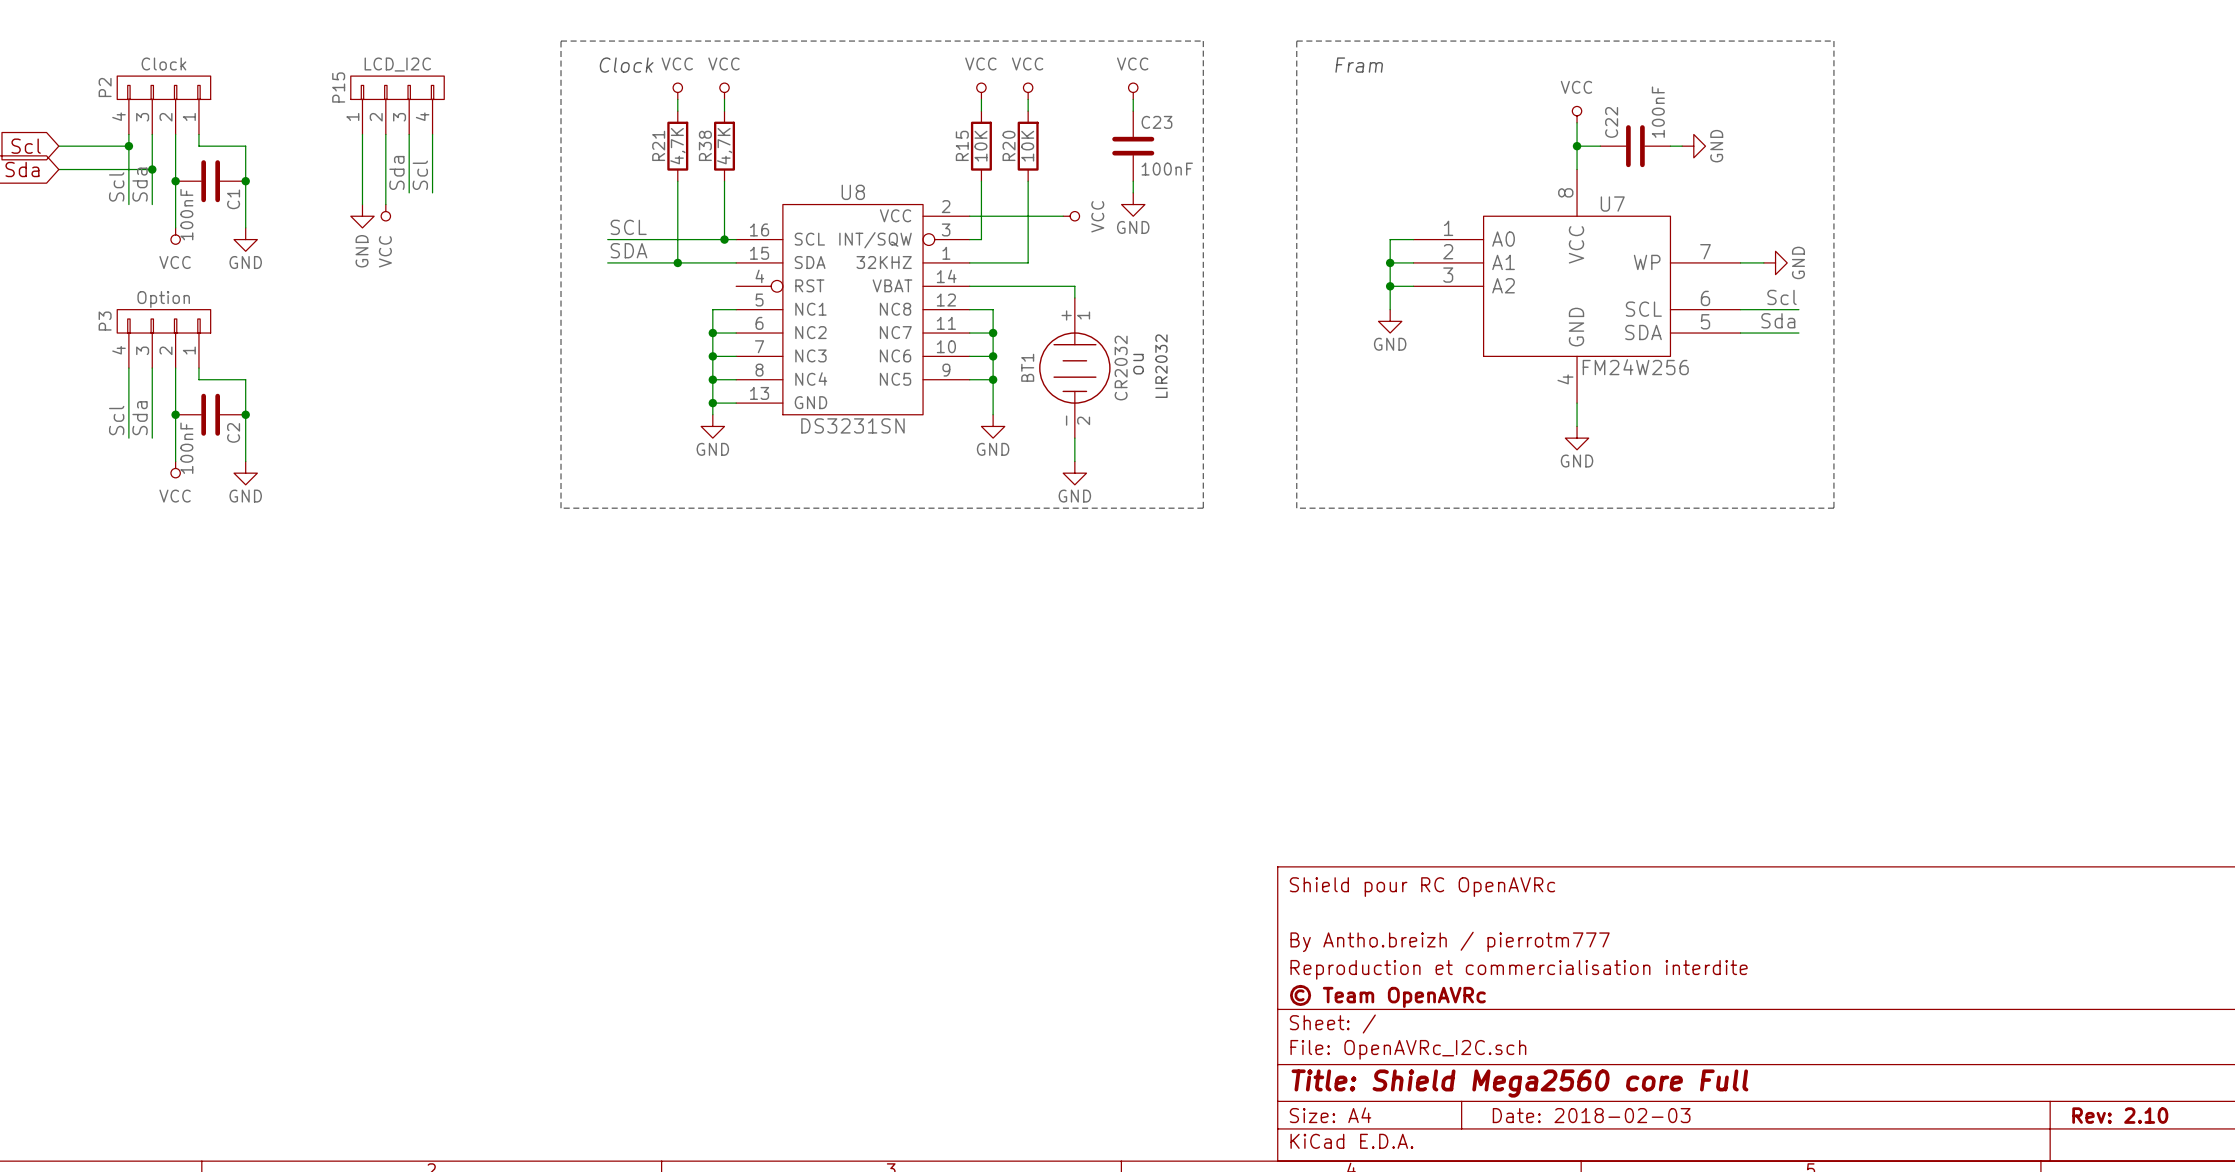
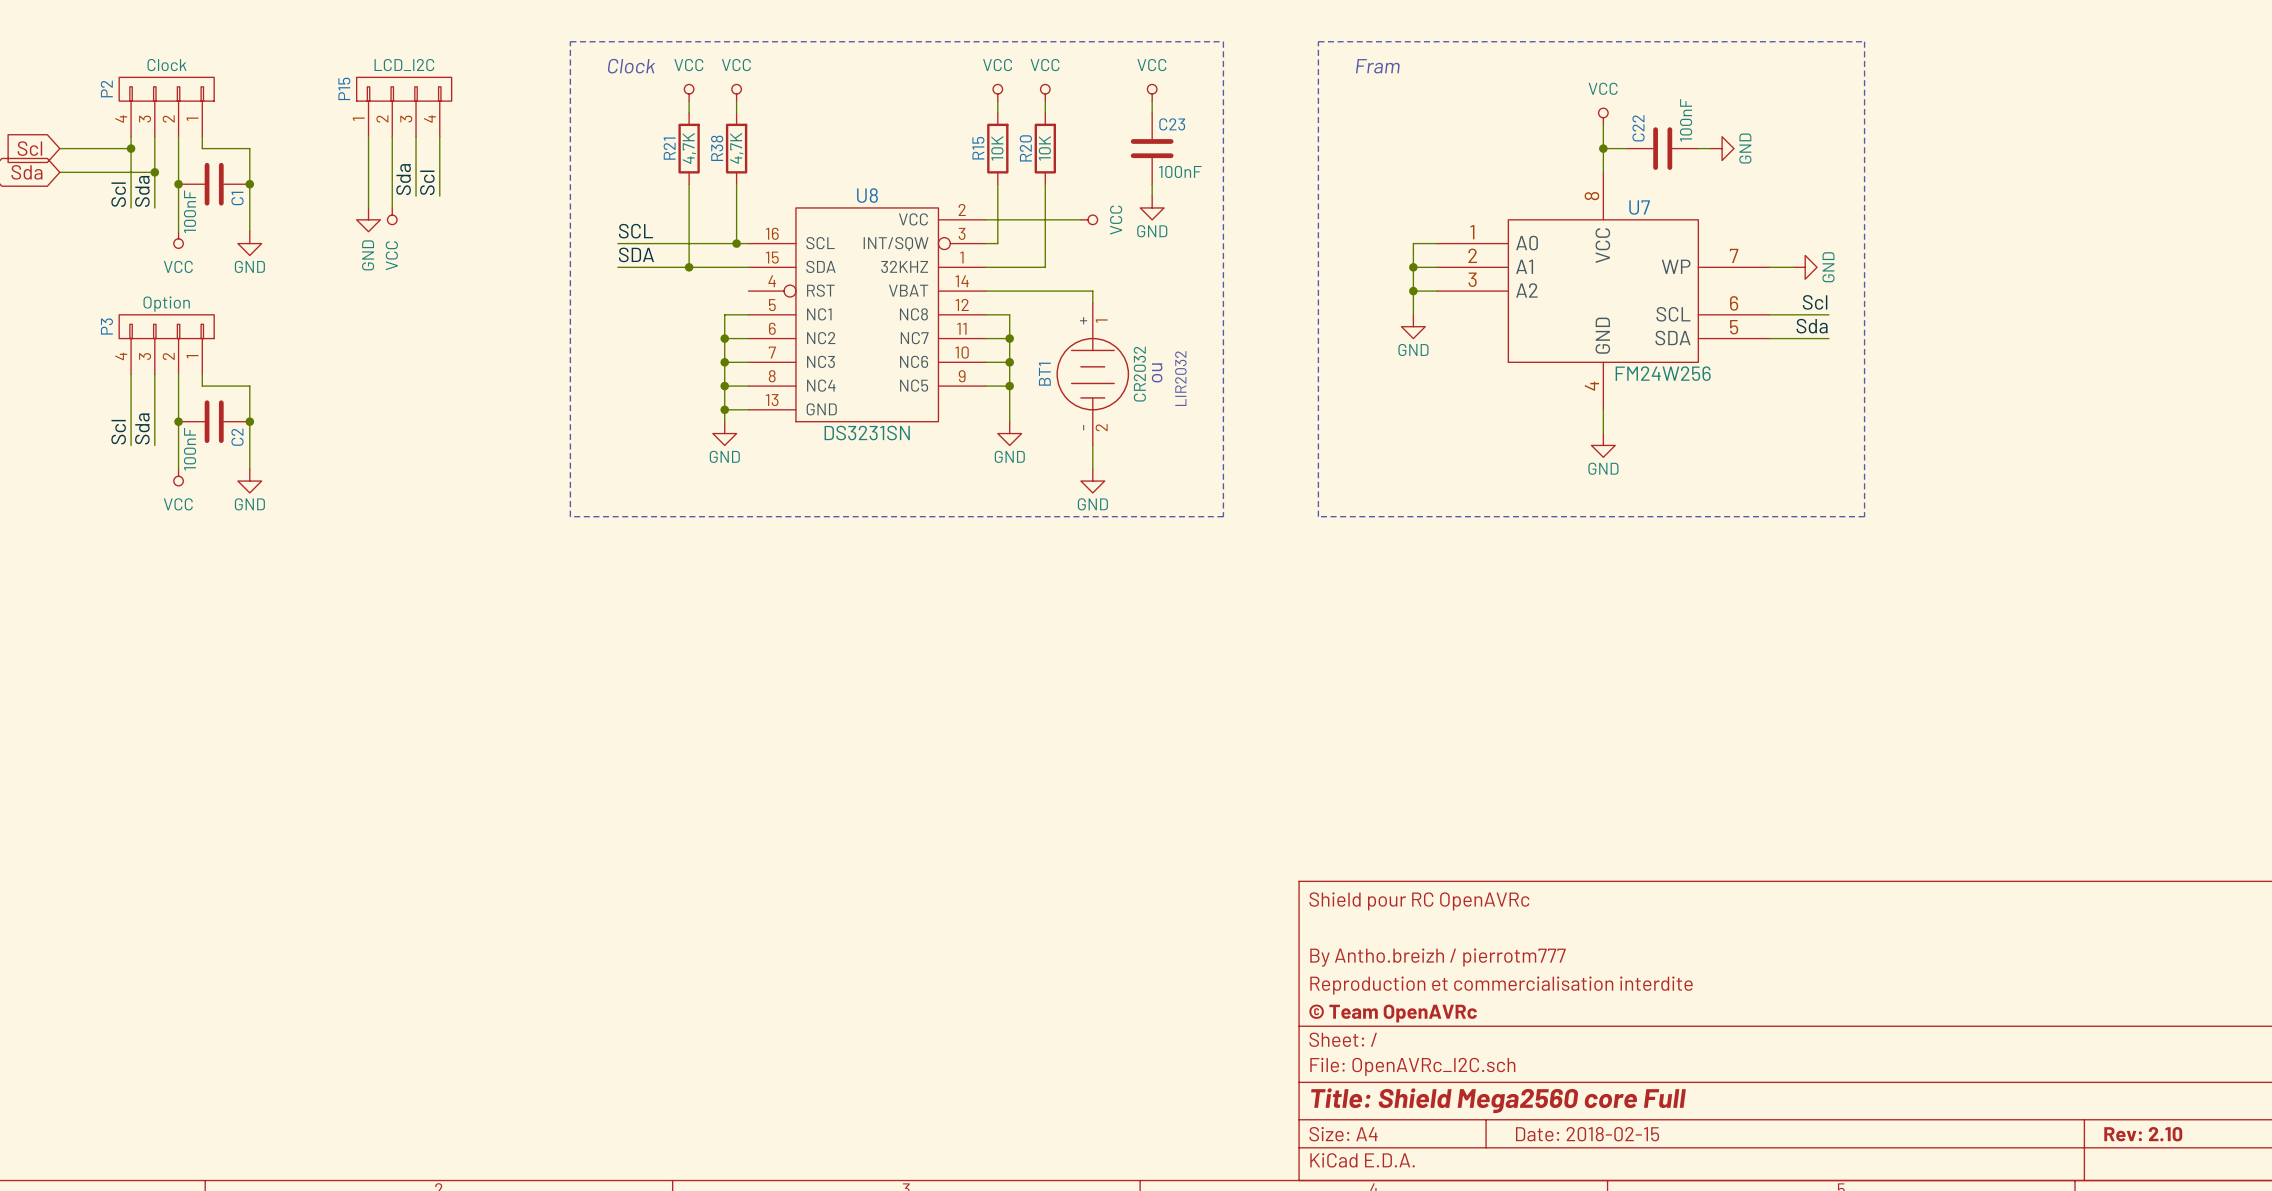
title block: Date: 2018-02-03 (1591, 1115) -> Date: 2018-02-15 (1587, 1134)

